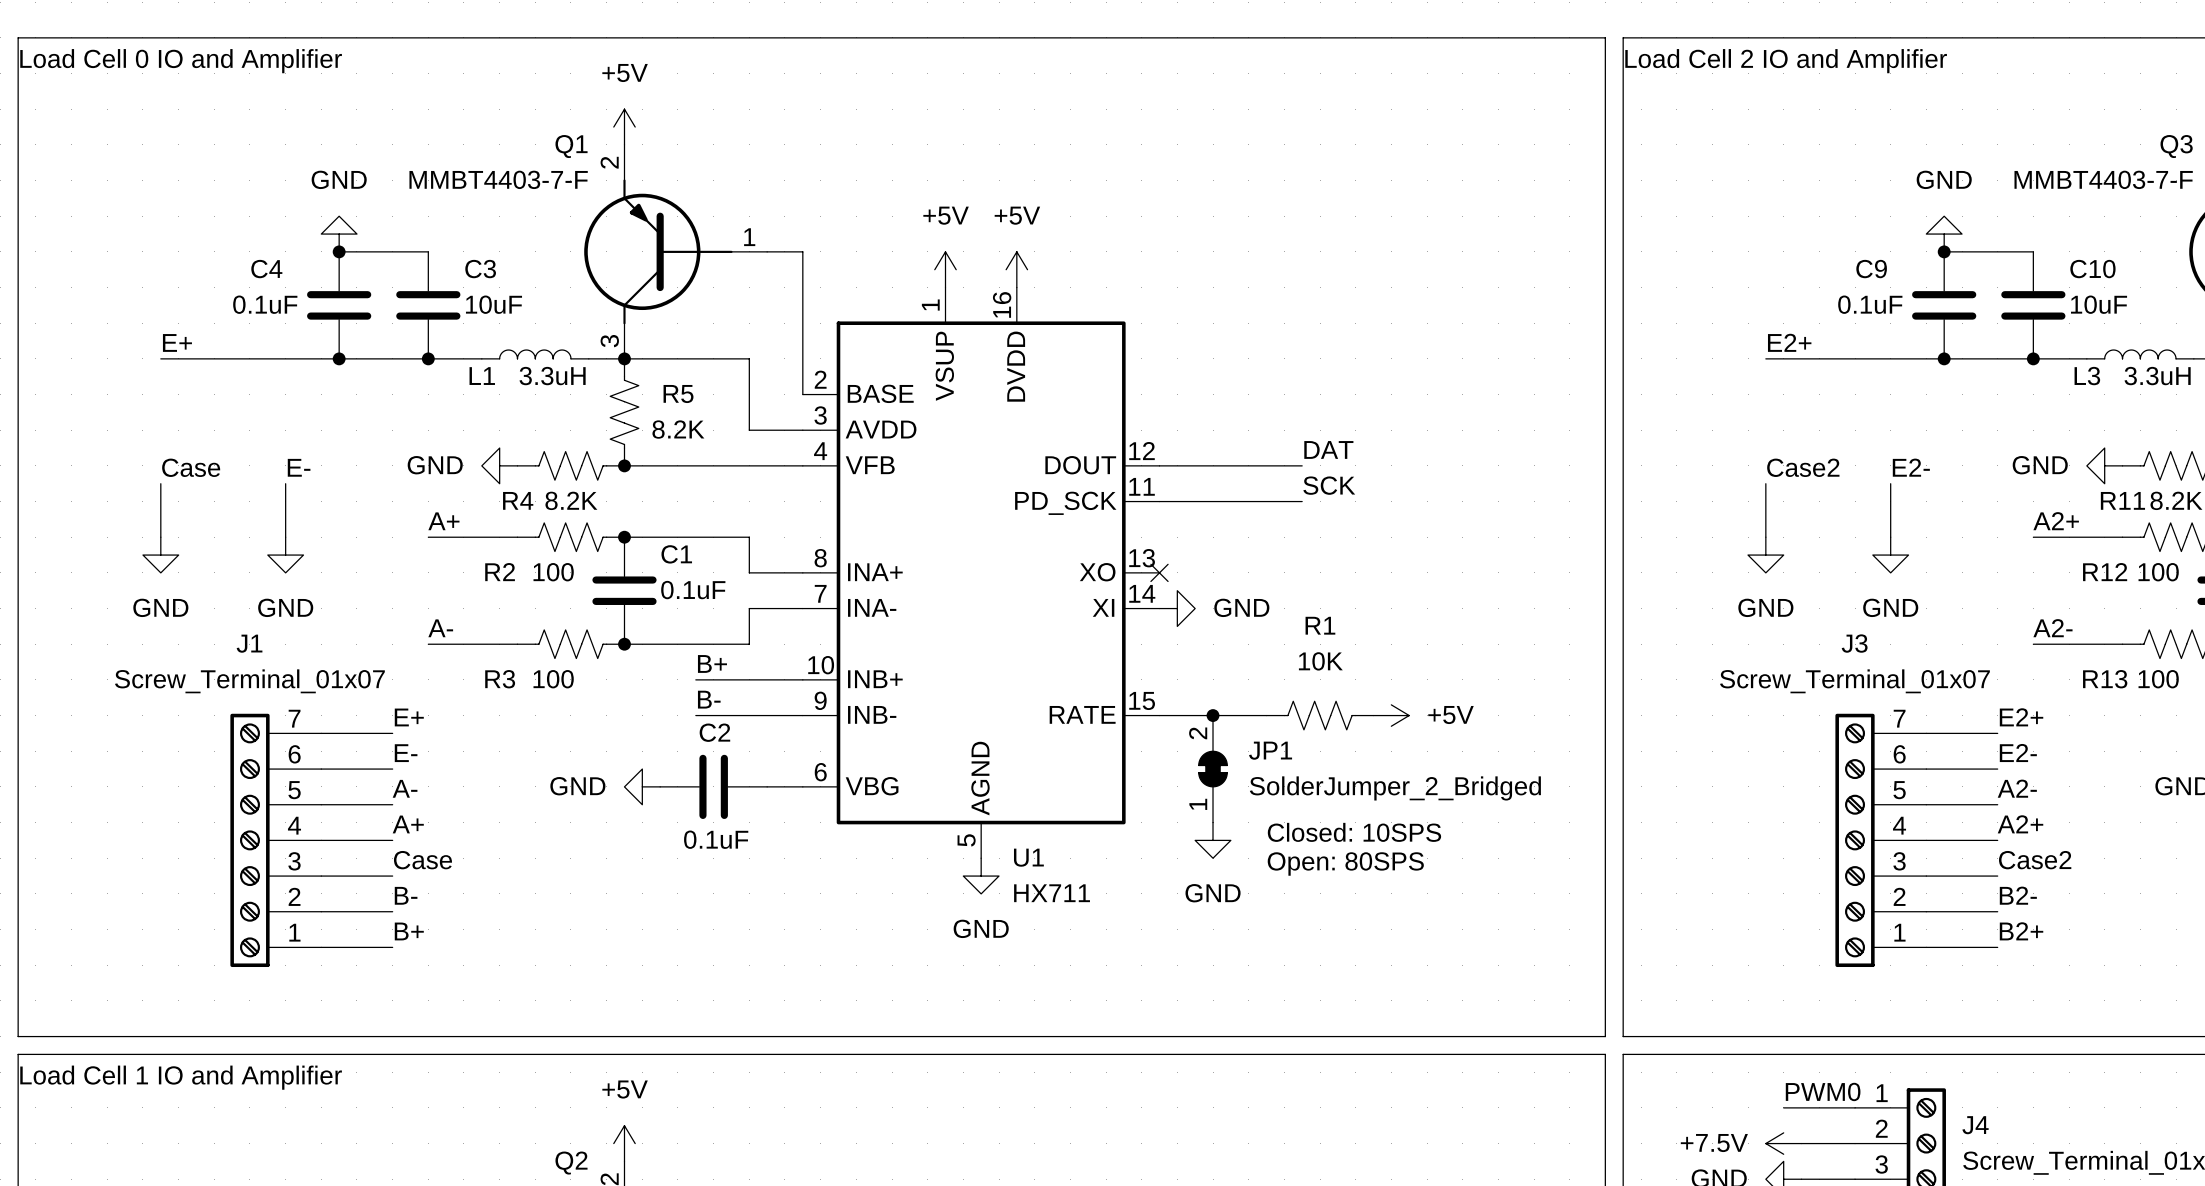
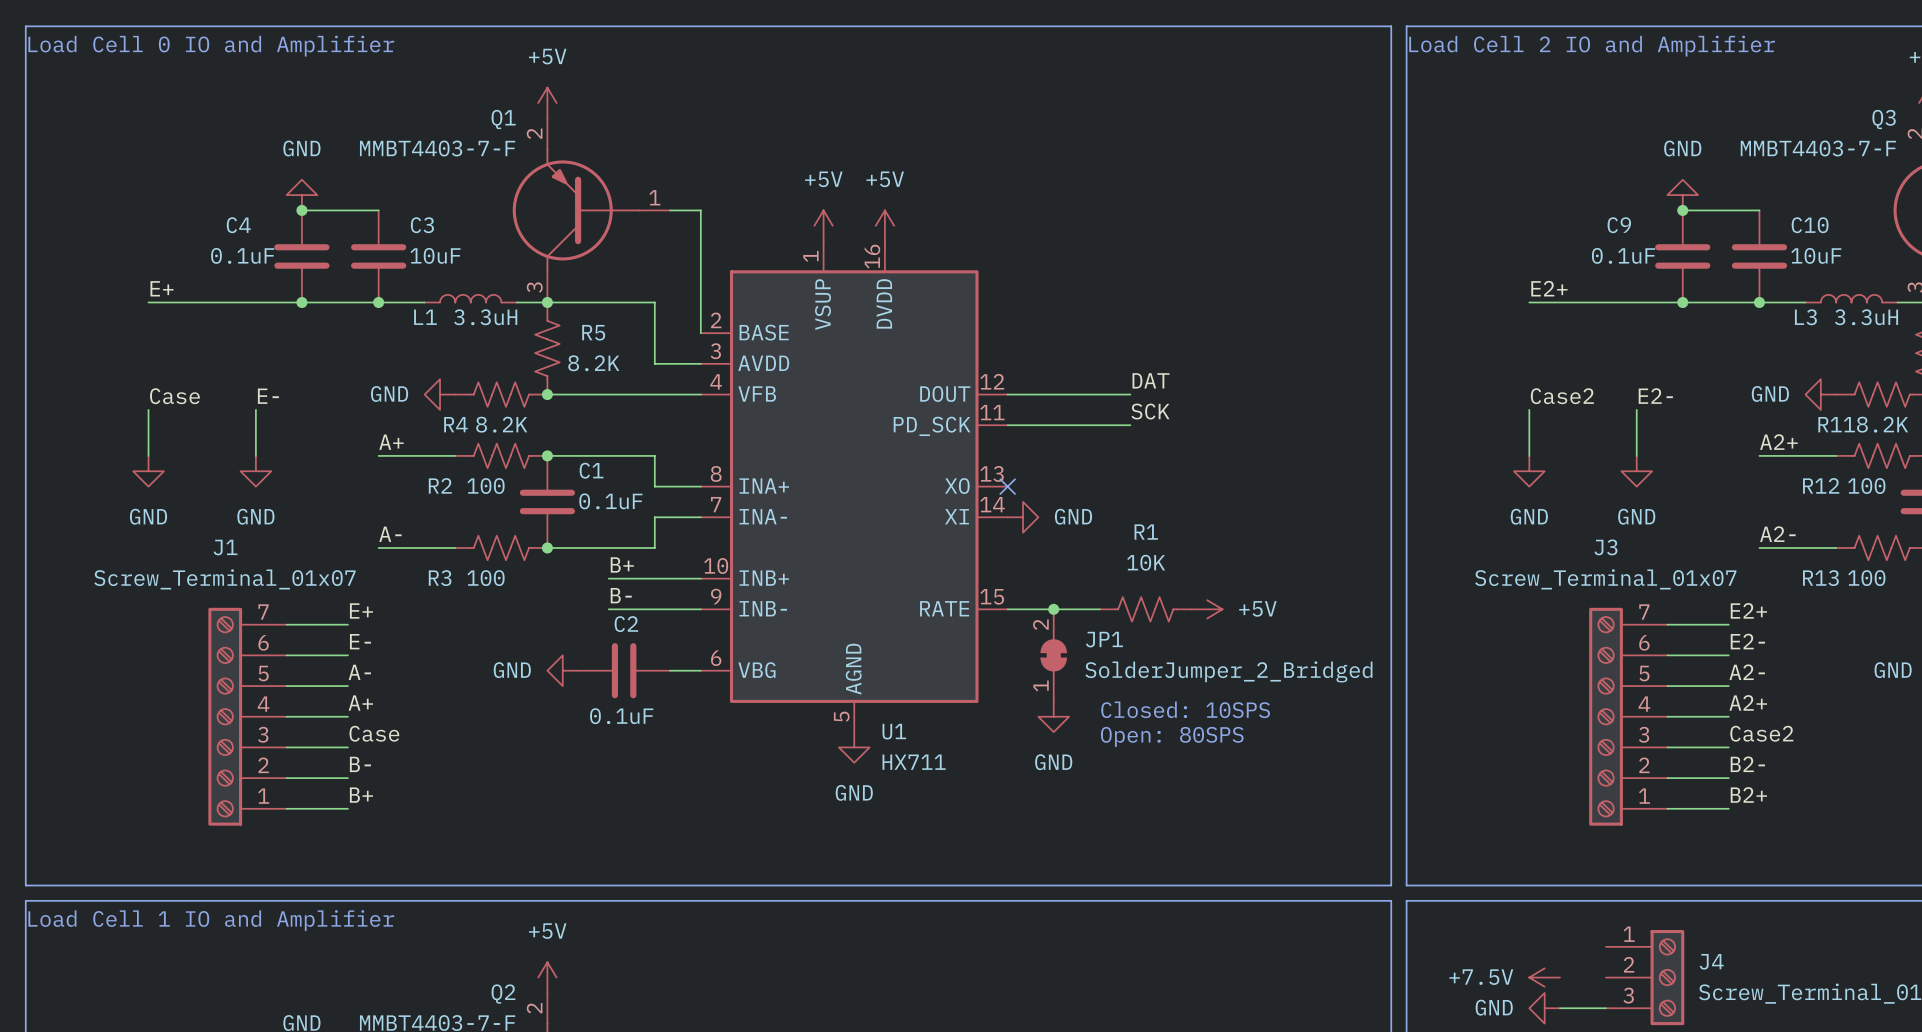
label: PWM0 (1823, 1091) -> none
wire: (1783, 1107) (1855, 1107) -> none
wire: (1801, 1143) (1855, 1143) -> none

